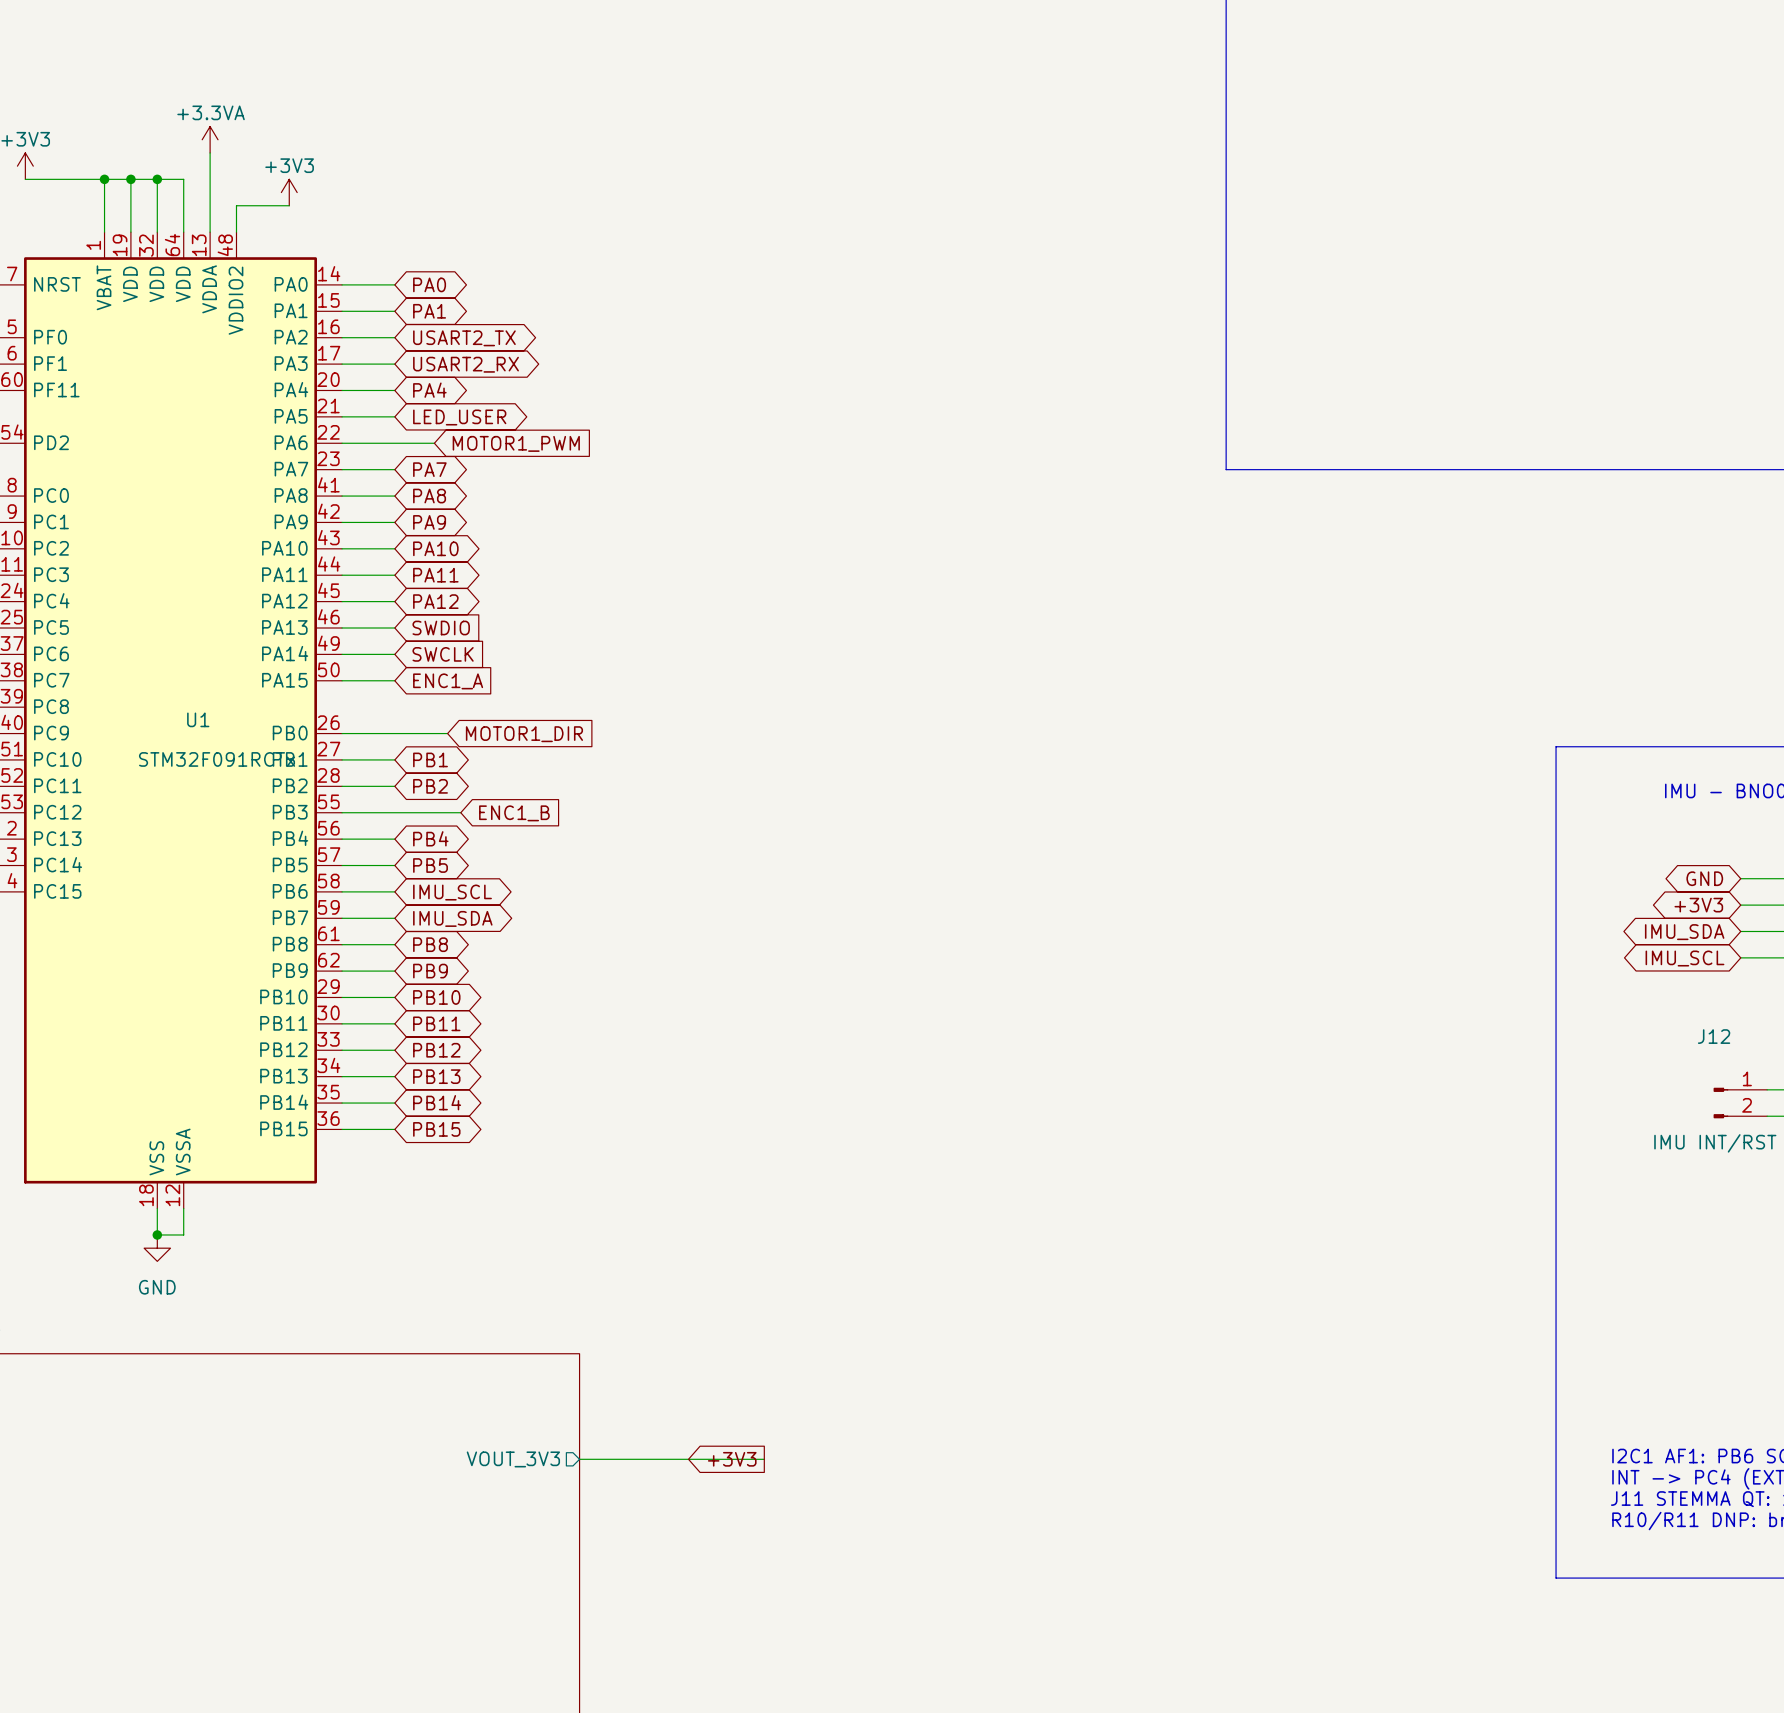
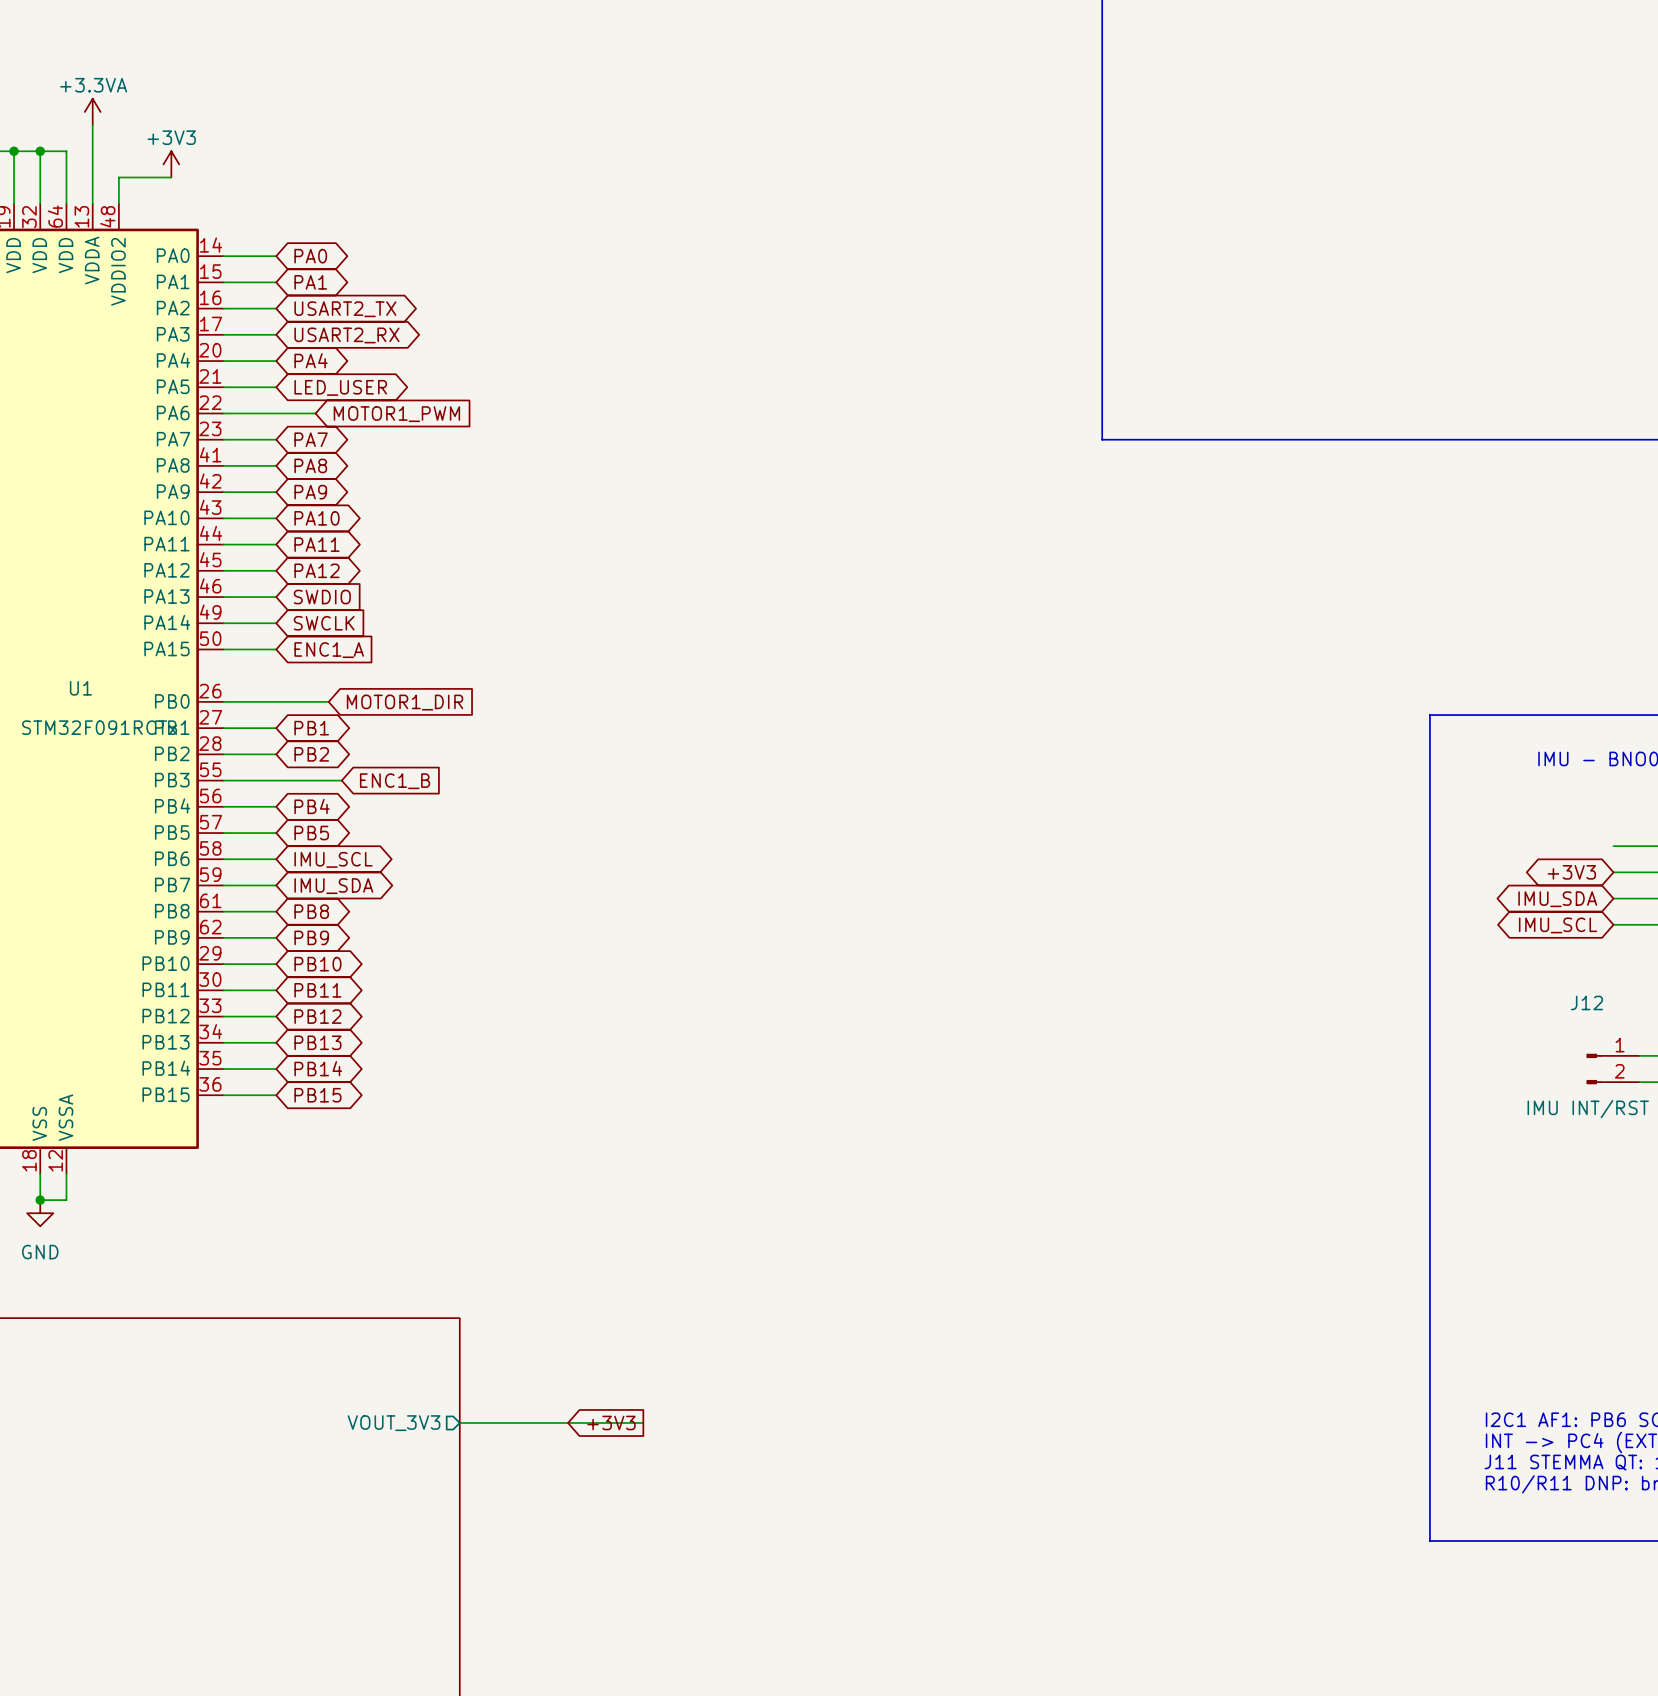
global label: GND (1704, 878) -> none

